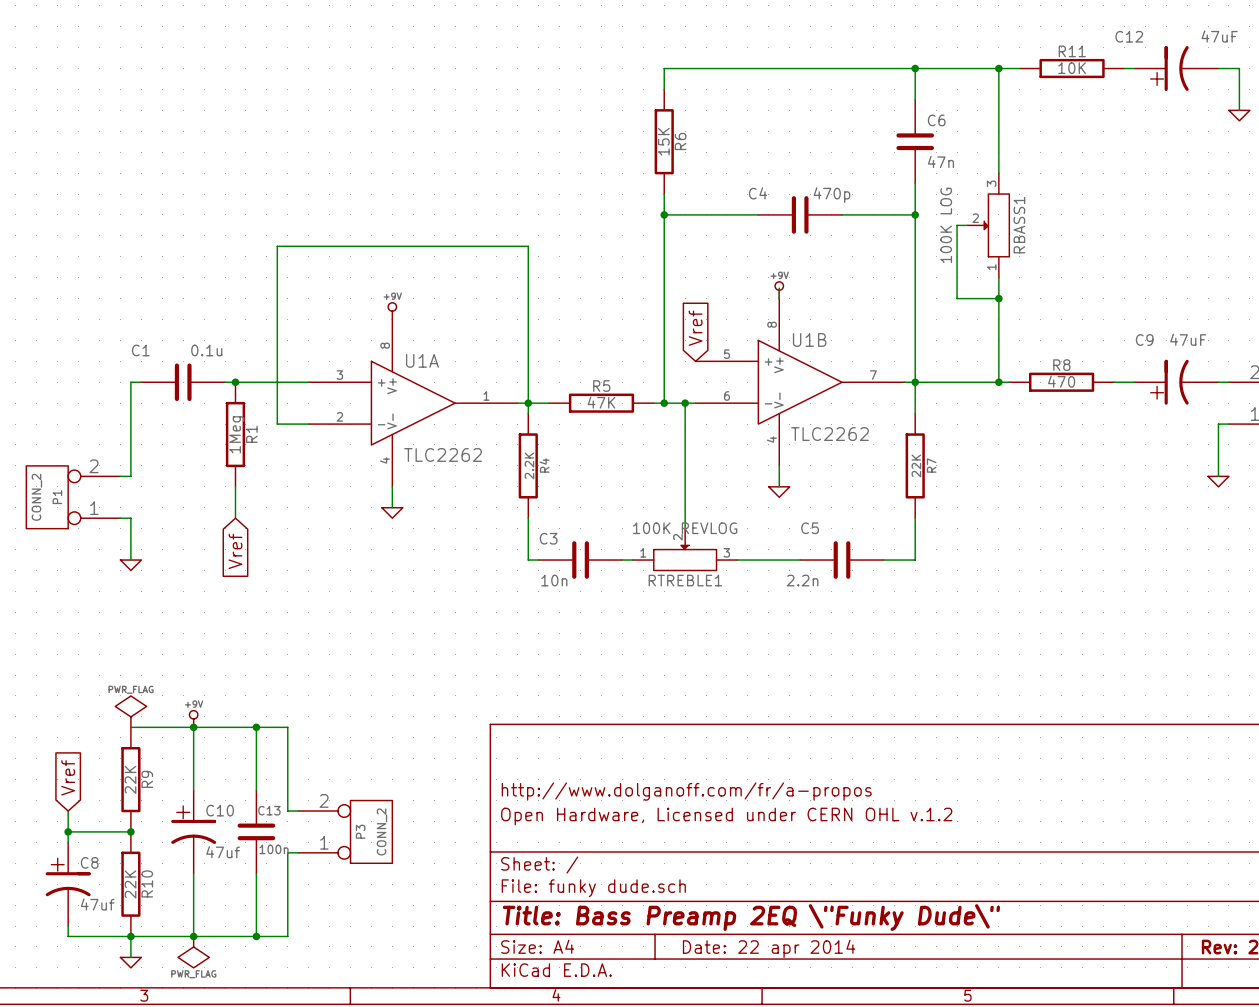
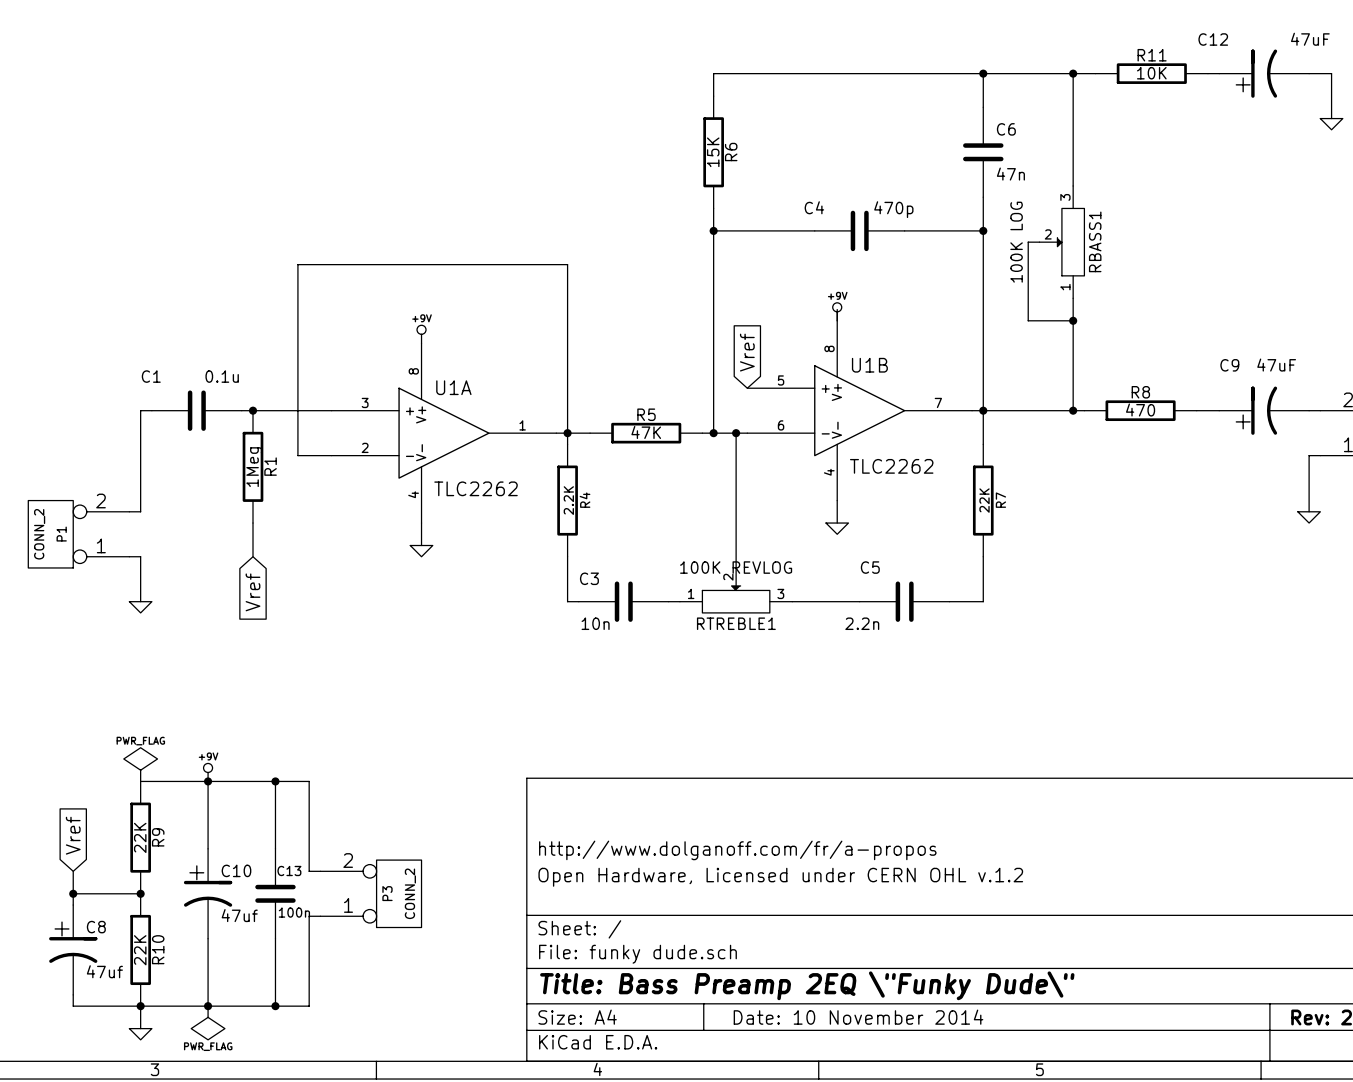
title block: Date: 22 apr 2014 (769, 948) -> Date: 10 November 2014 (858, 1017)

